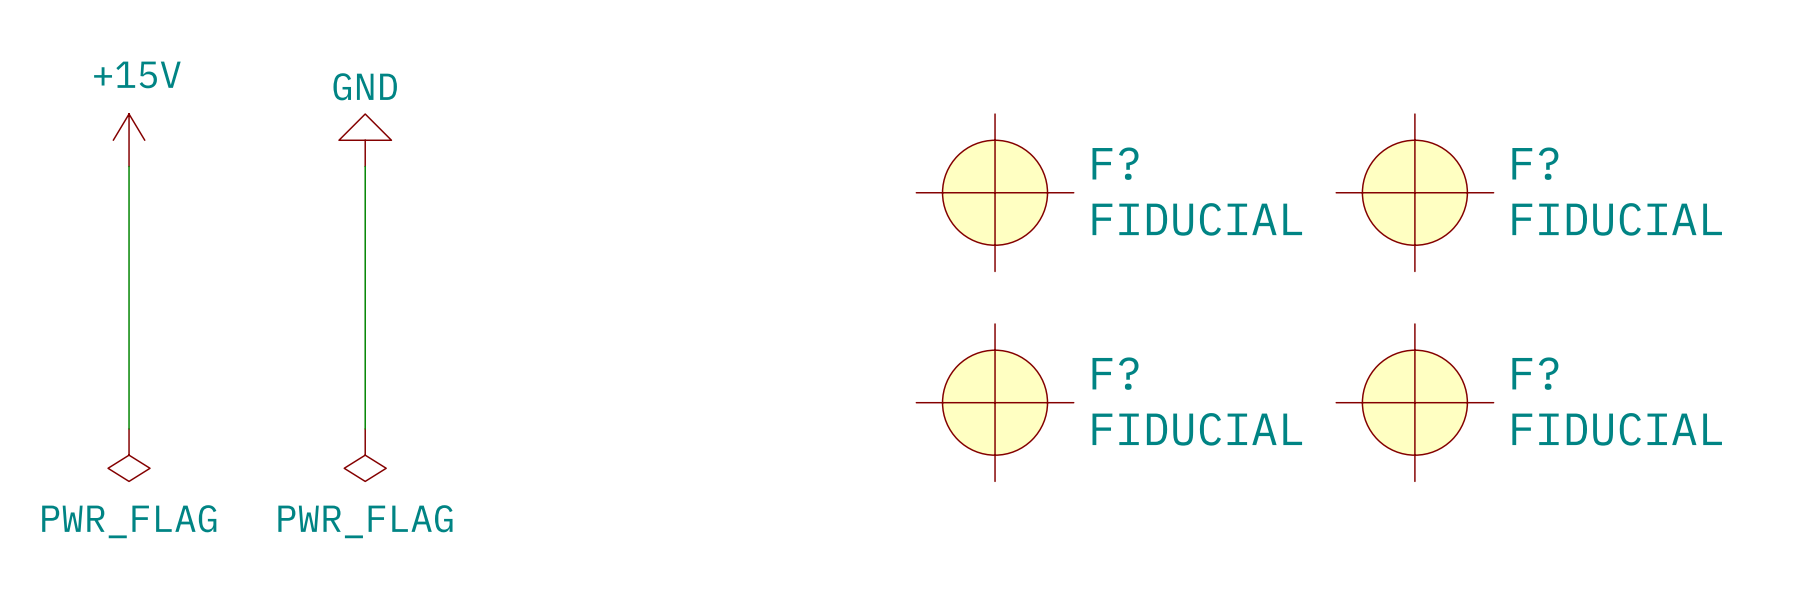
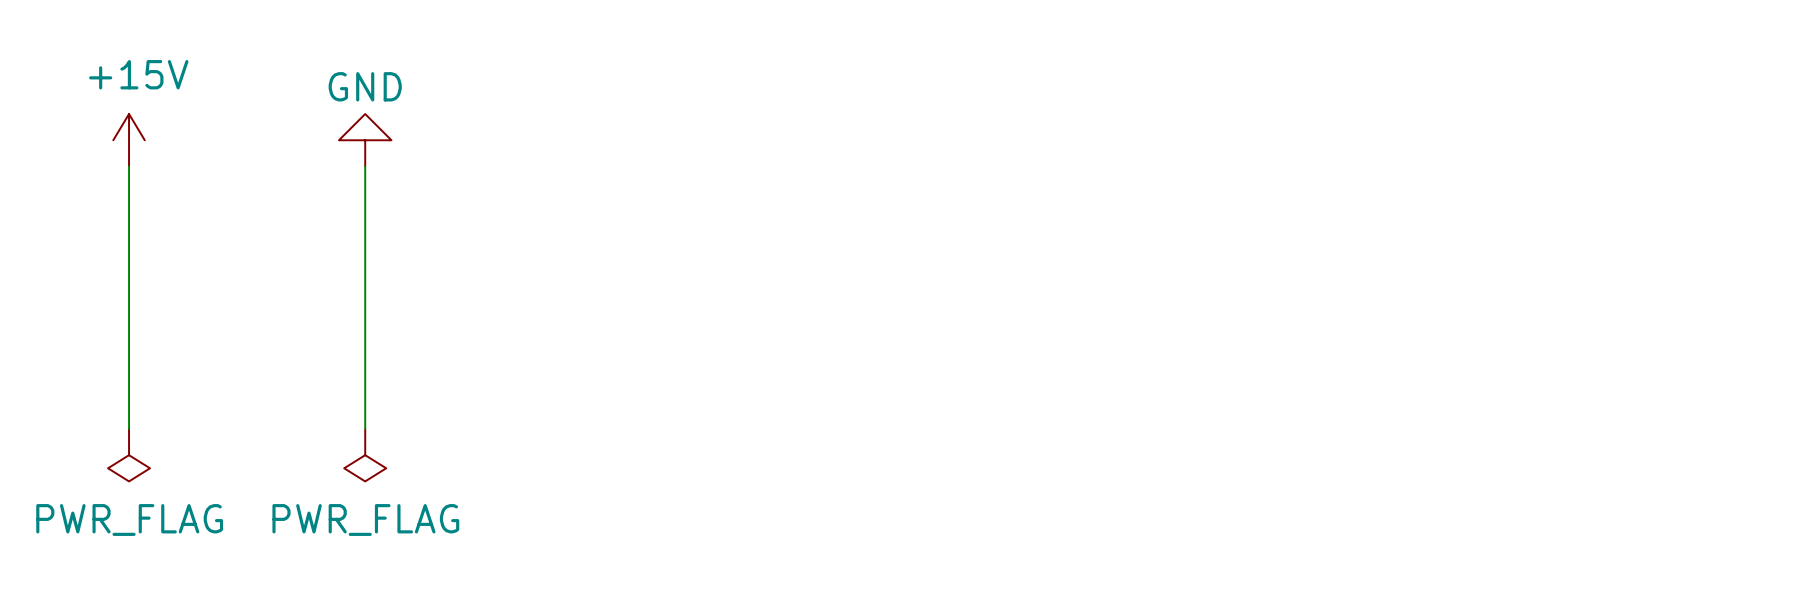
F?: FIDUCIAL (995, 192) -> none
F?: FIDUCIAL (1414, 192) -> none
F?: FIDUCIAL (995, 402) -> none
F?: FIDUCIAL (1414, 402) -> none

